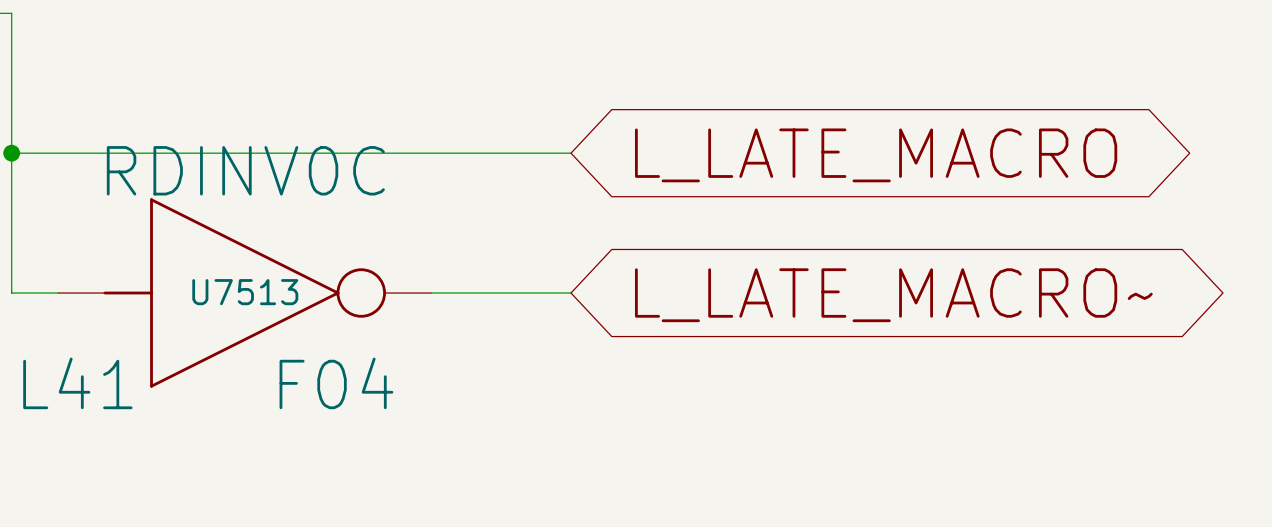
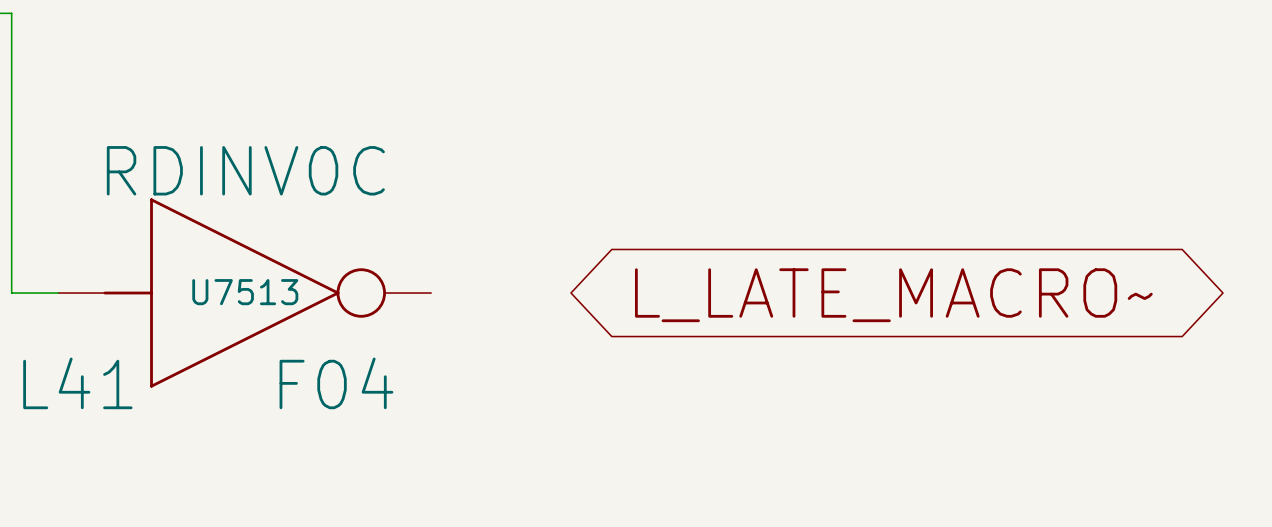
wire: (11, 153) (571, 153) -> none
junction: (11, 153) -> none
global label: L_LATE_MACRO (876, 155) -> none
wire: (431, 293) (571, 293) -> none

